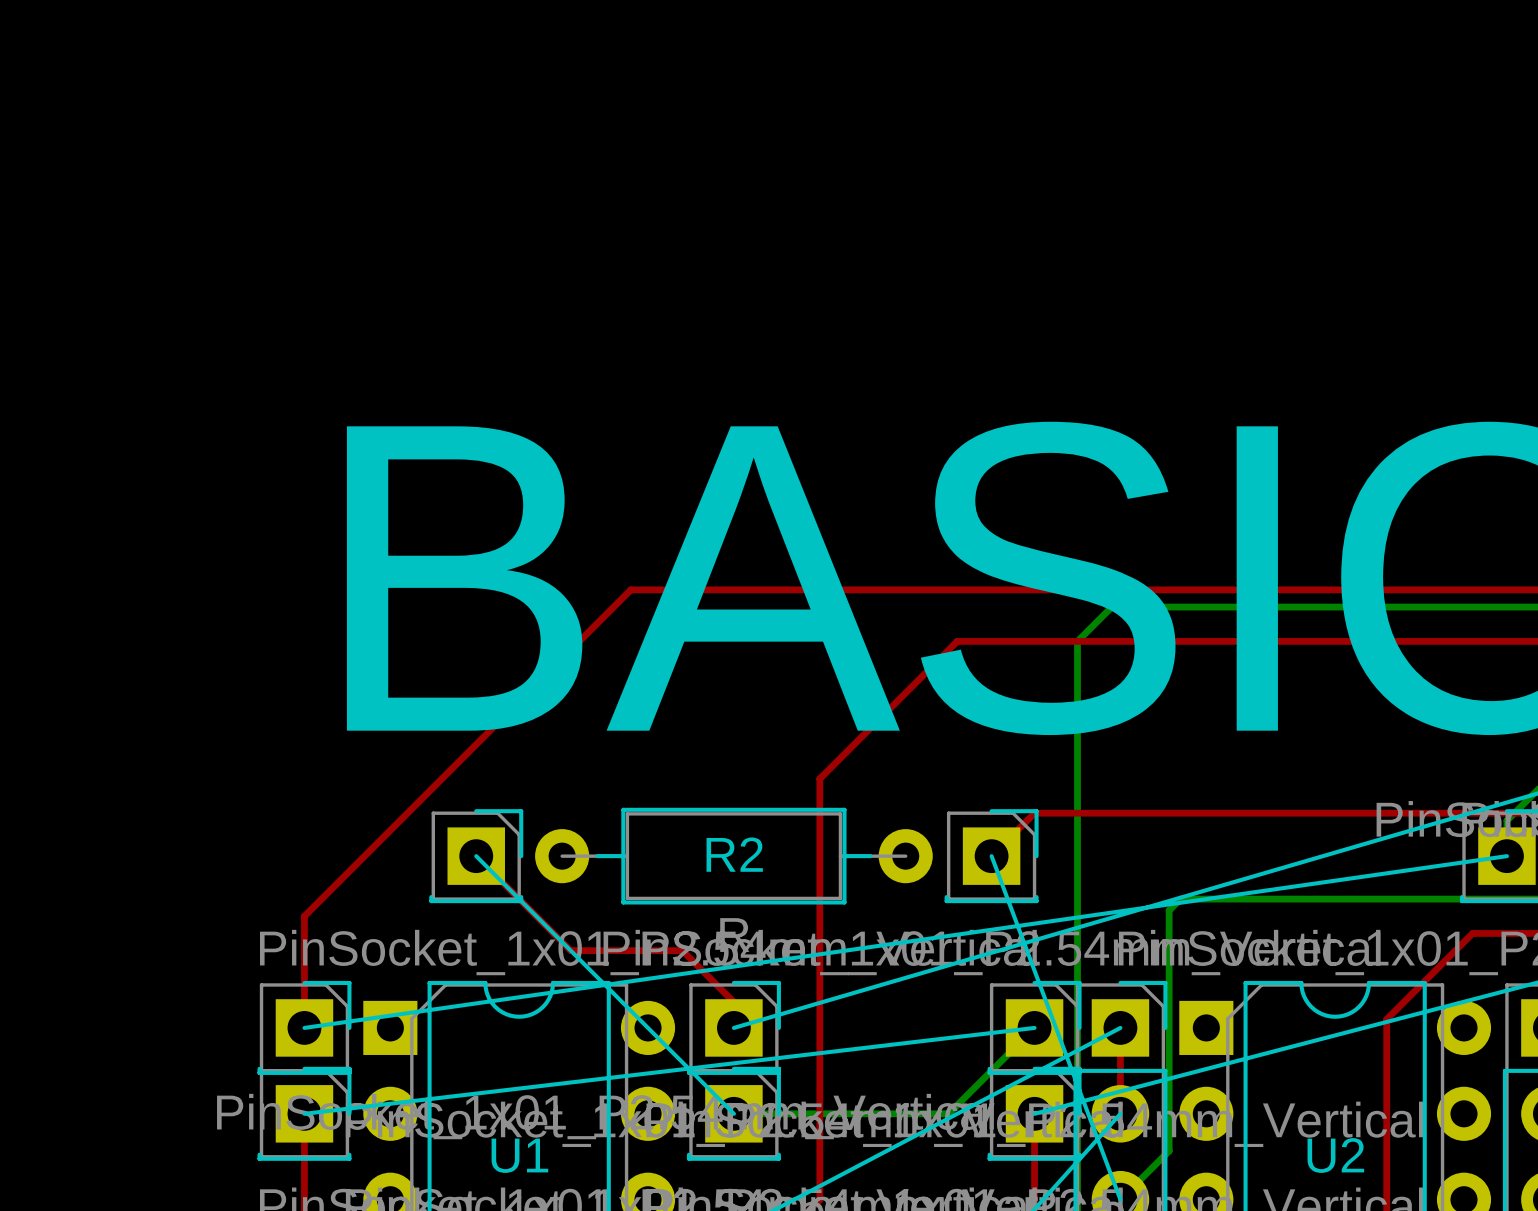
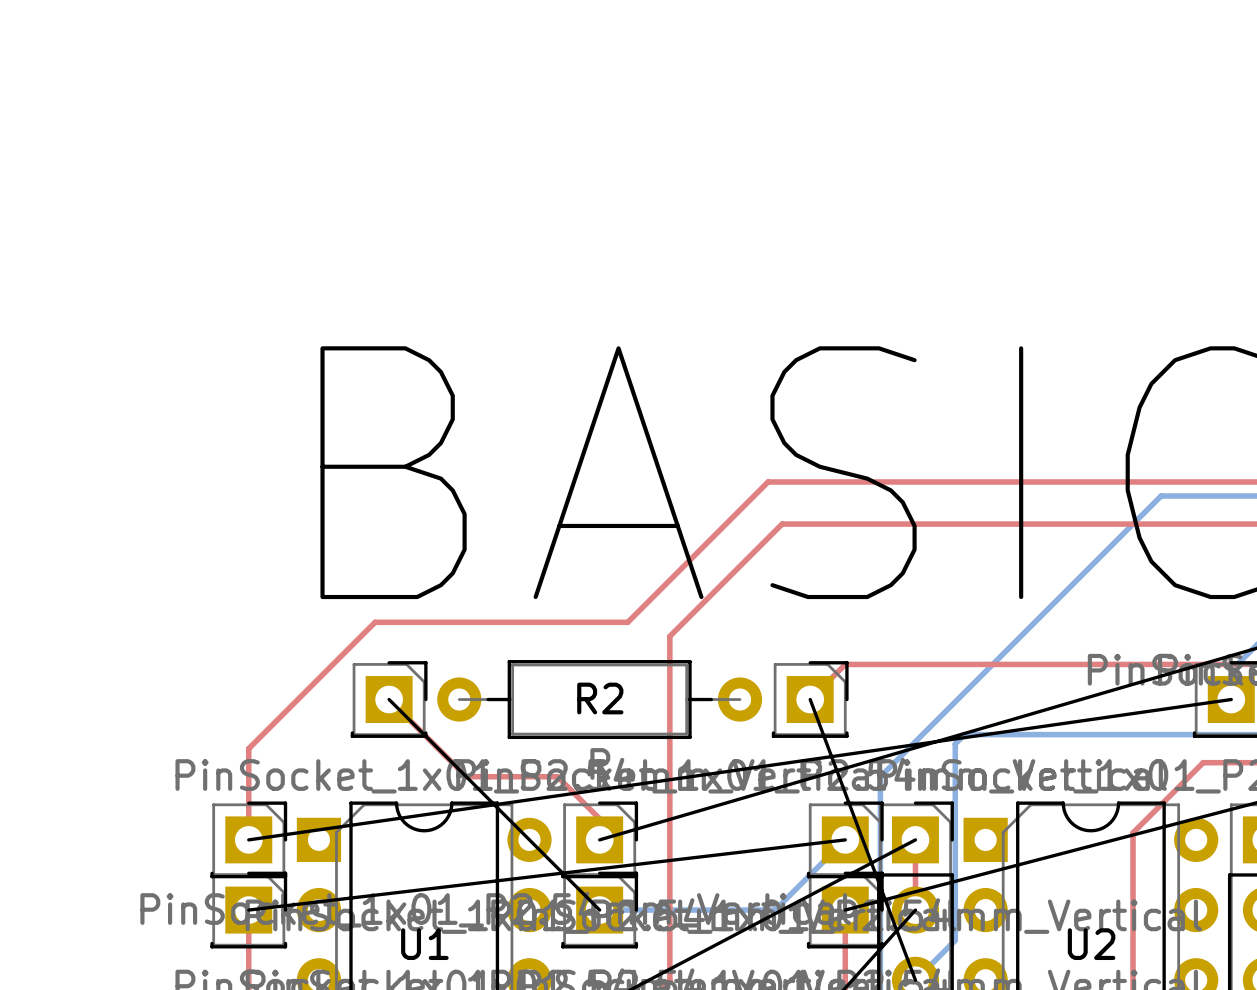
top track: (940, 589) (630, 589) (459, 761) -> (768, 481) (627, 622) (375, 622)
bottom track: (1421, 607) (1111, 607) (1077, 641) (1077, 950) -> (1161, 496) (880, 776)

